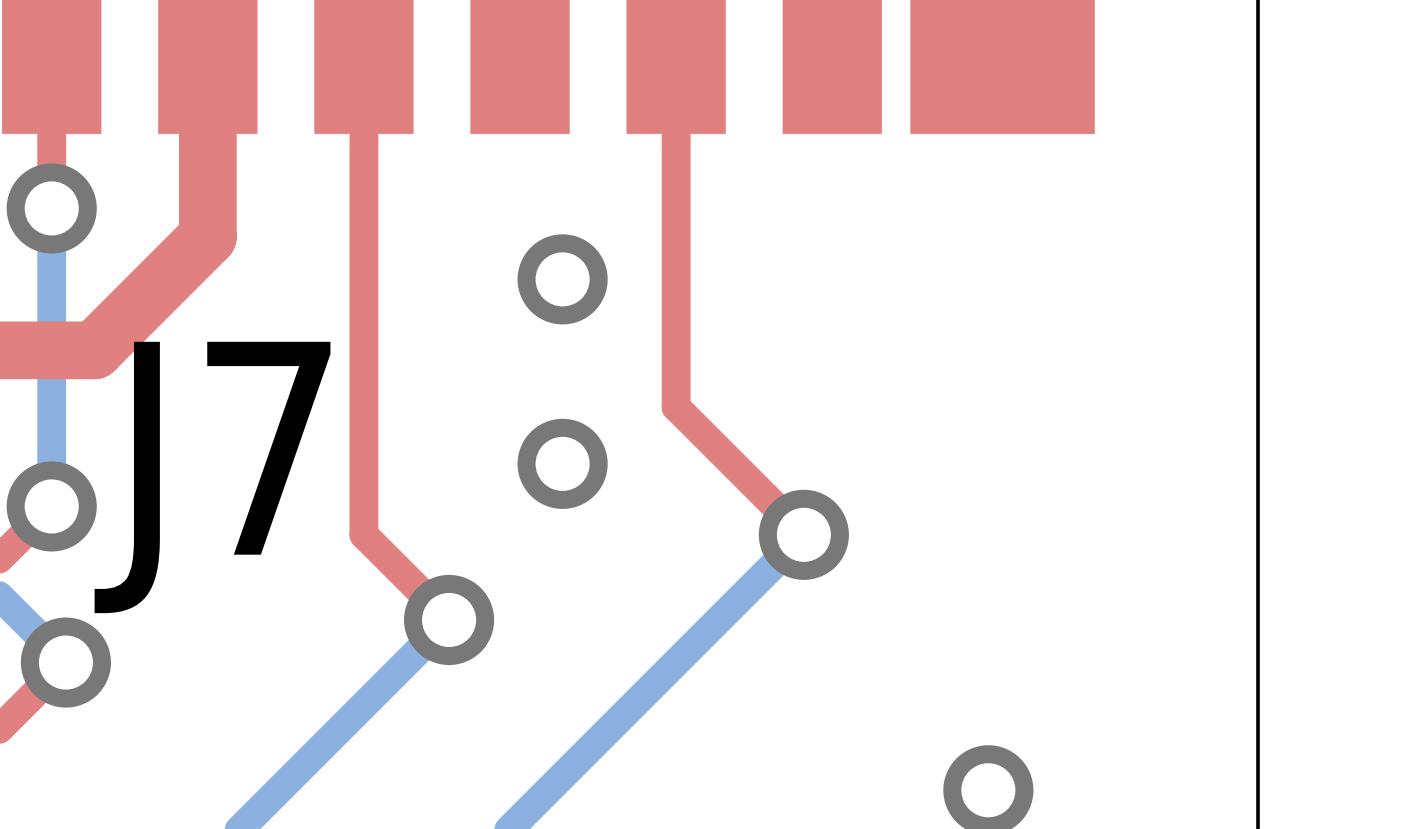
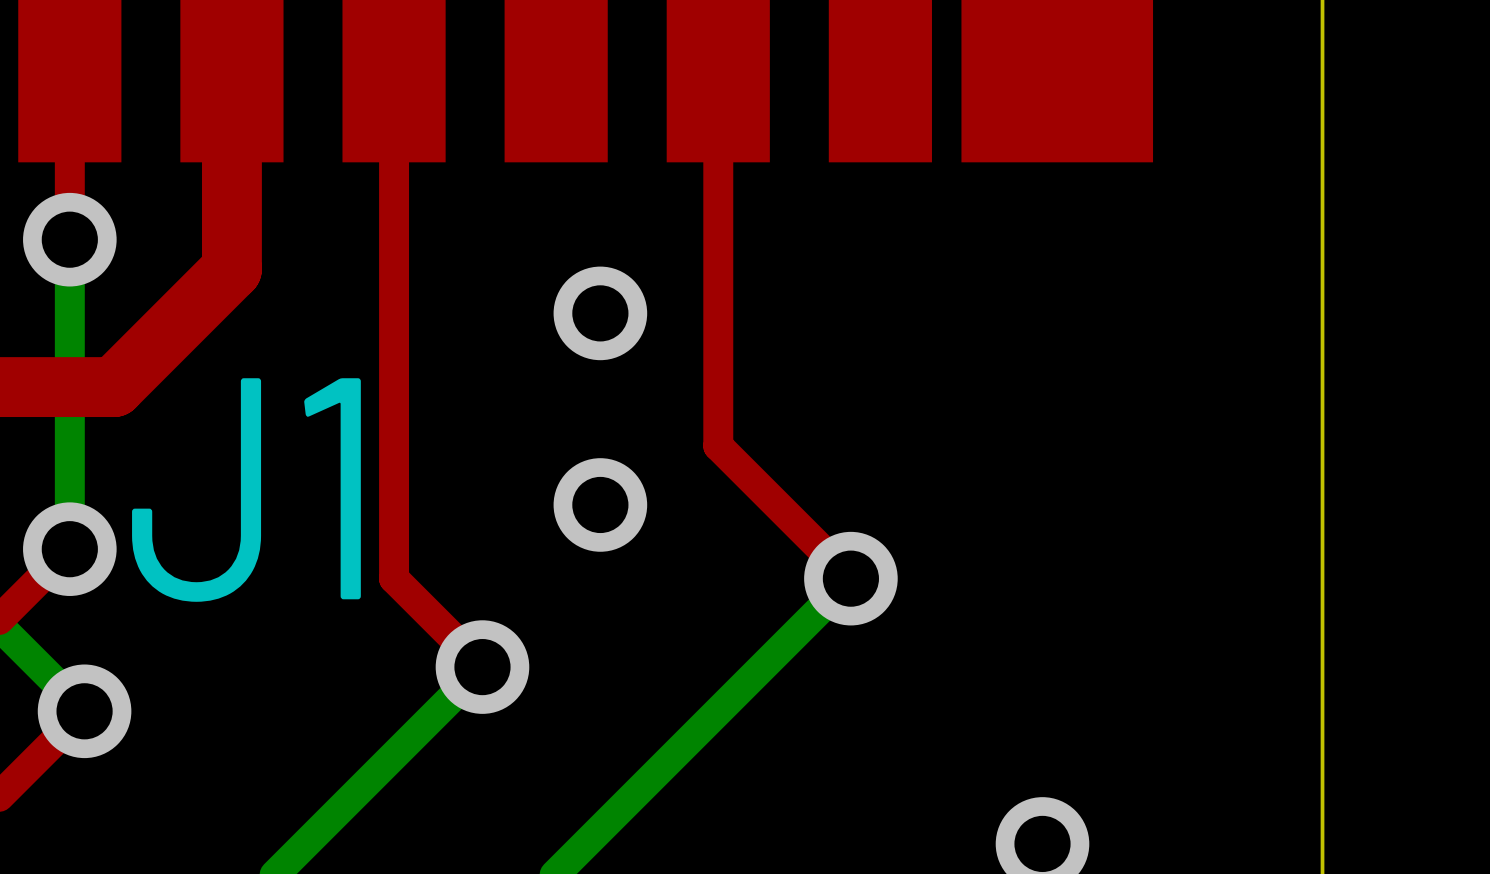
J7 name: J7 (212, 477) -> J1 (246, 490)

